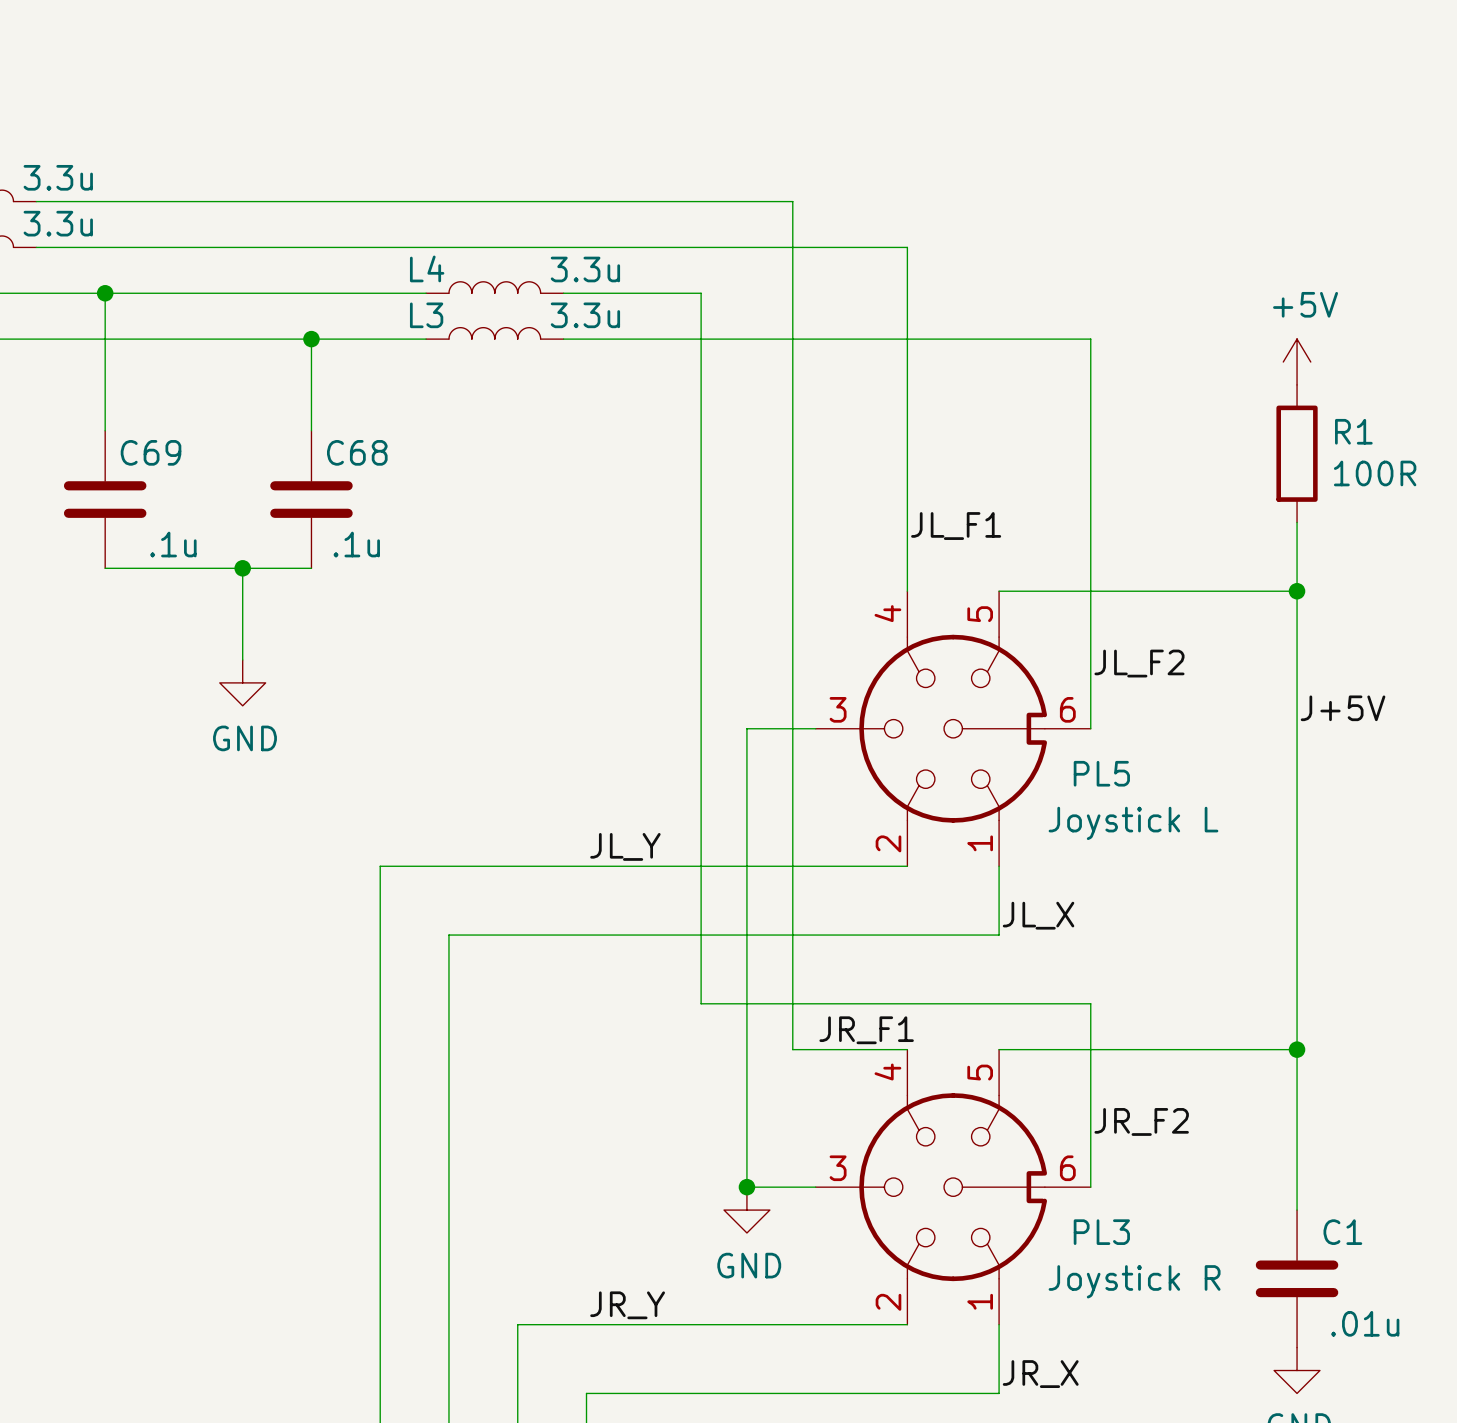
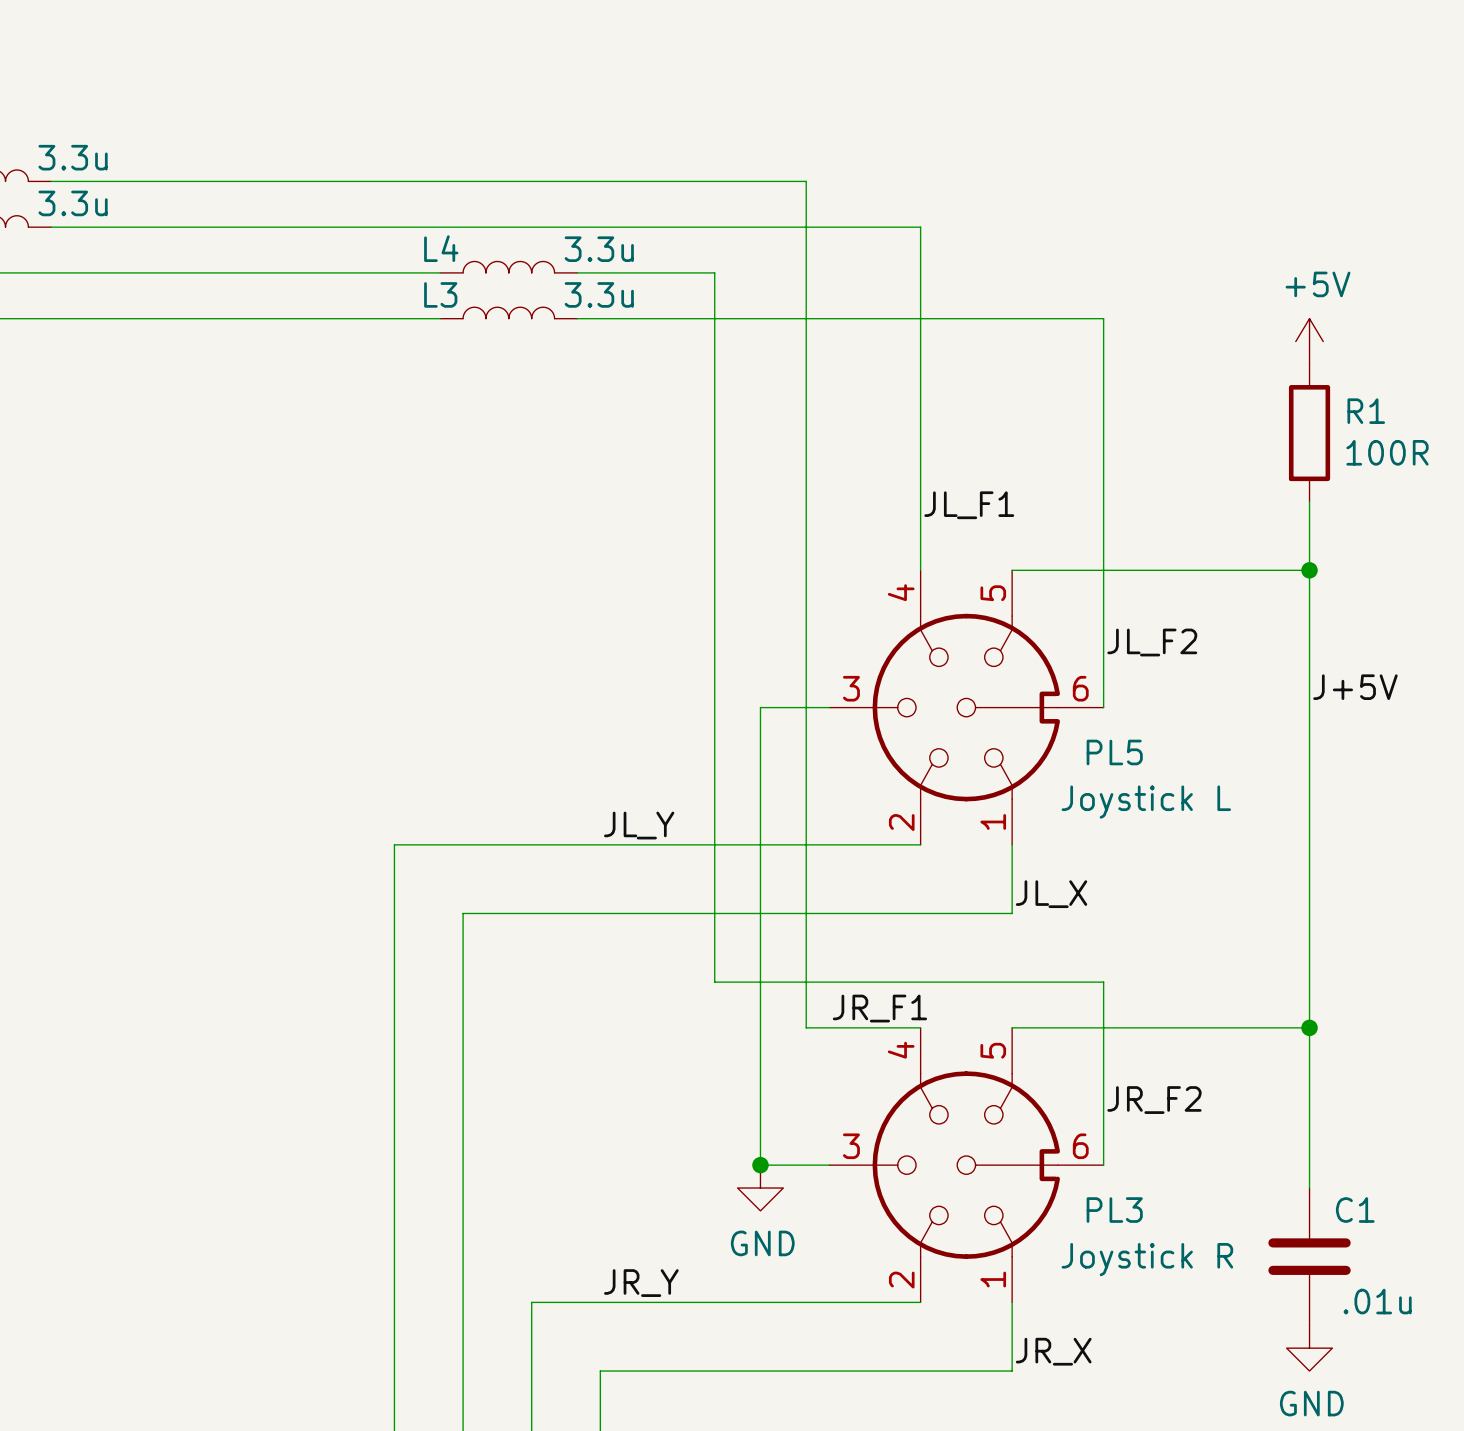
wire: (105, 293) (105, 430) -> none
junction: (105, 293) -> none
wire: (311, 339) (311, 430) -> none
junction: (311, 339) -> none
C69: .1u (105, 499) -> none
C68: .1u (311, 499) -> none
wire: (105, 568) (311, 568) -> none
wire: (242, 568) (242, 659) -> none
junction: (242, 568) -> none
power symbol: GND (242, 682) -> none

